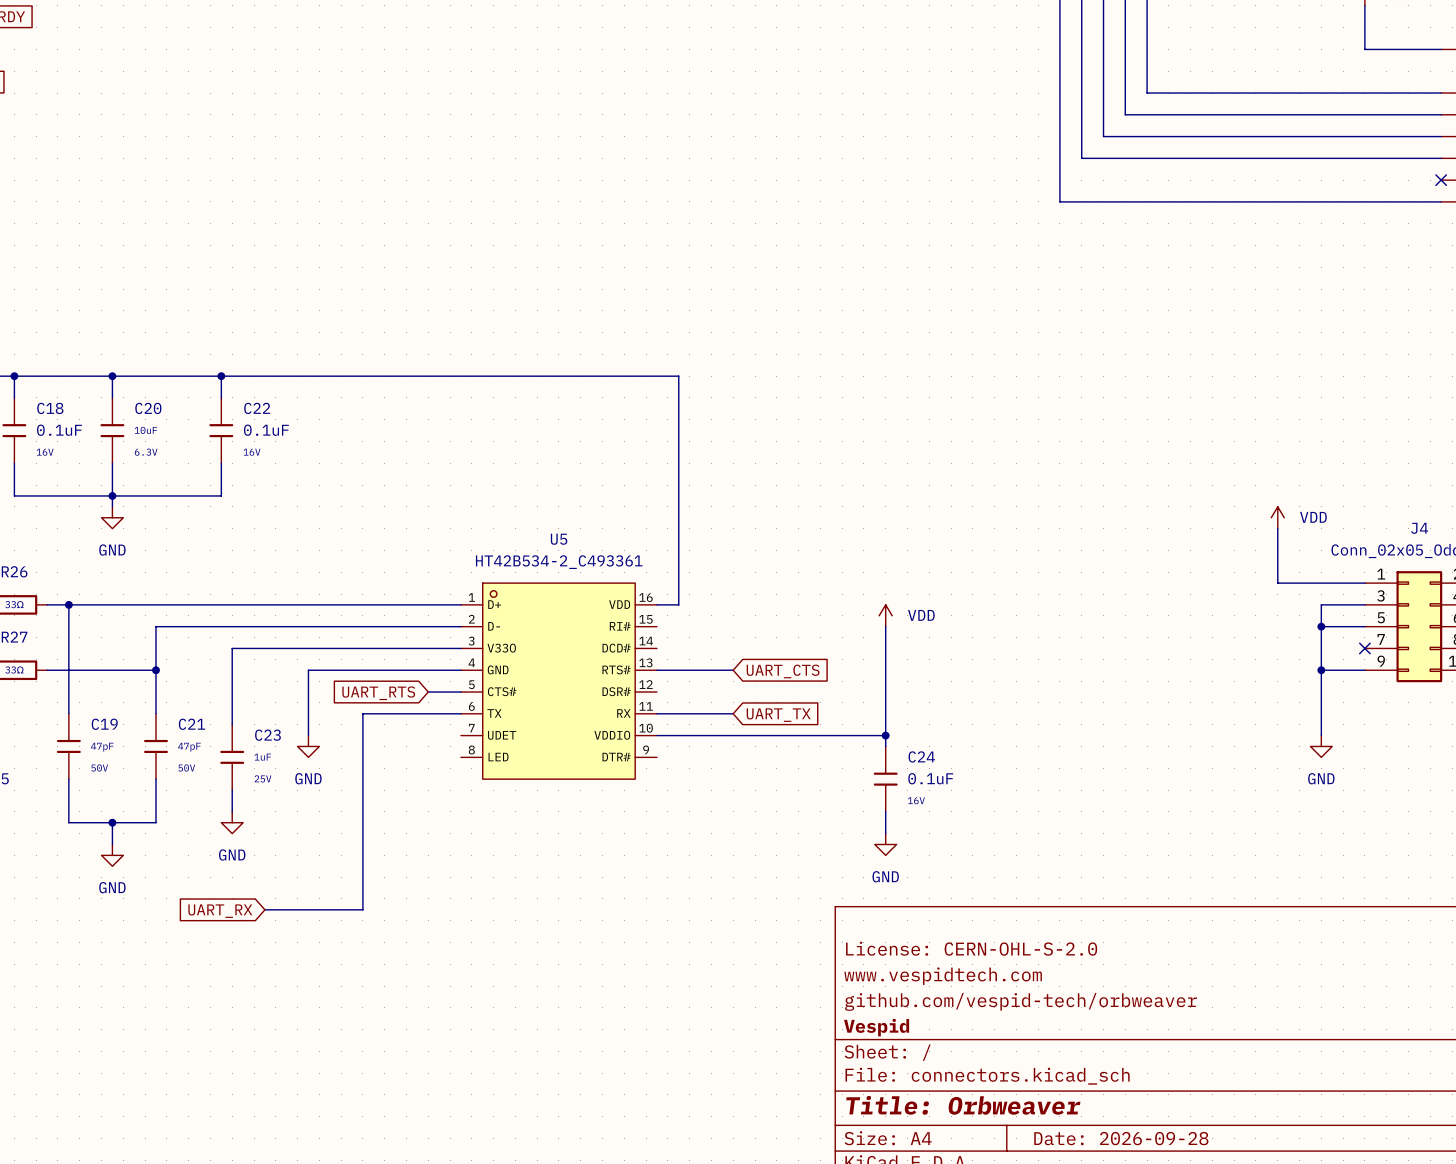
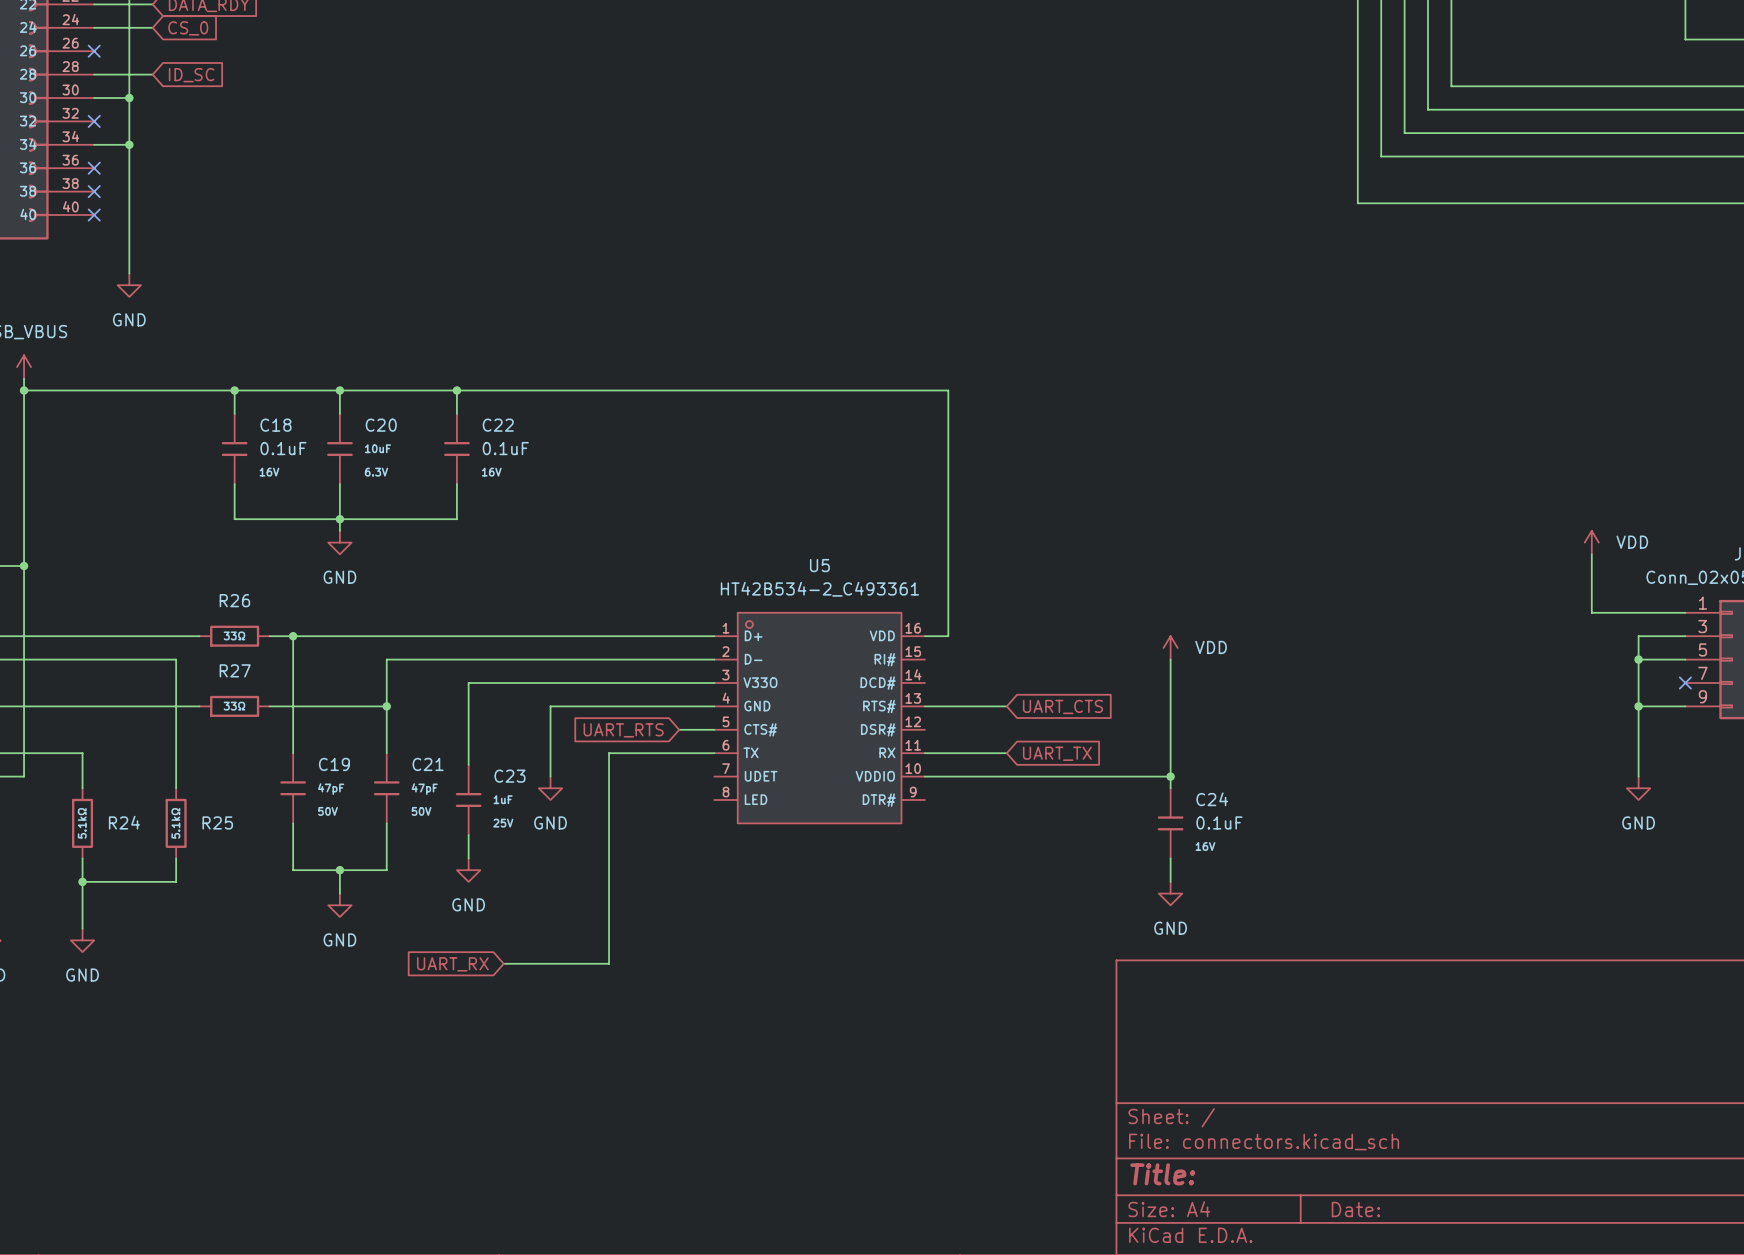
title block: License: CERN-OHL-S-2.0 (971, 948) -> none
title block: www.vespidtech.com (943, 976) -> none
title block: github.com/vespid-tech/orbweaver (1021, 1001) -> none
title block: Vespid (876, 1027) -> none
title block: Title: Orbweaver (963, 1105) -> Title: (1162, 1174)
title block: Date: 2026-09-28 (1121, 1138) -> Date: (1355, 1209)

